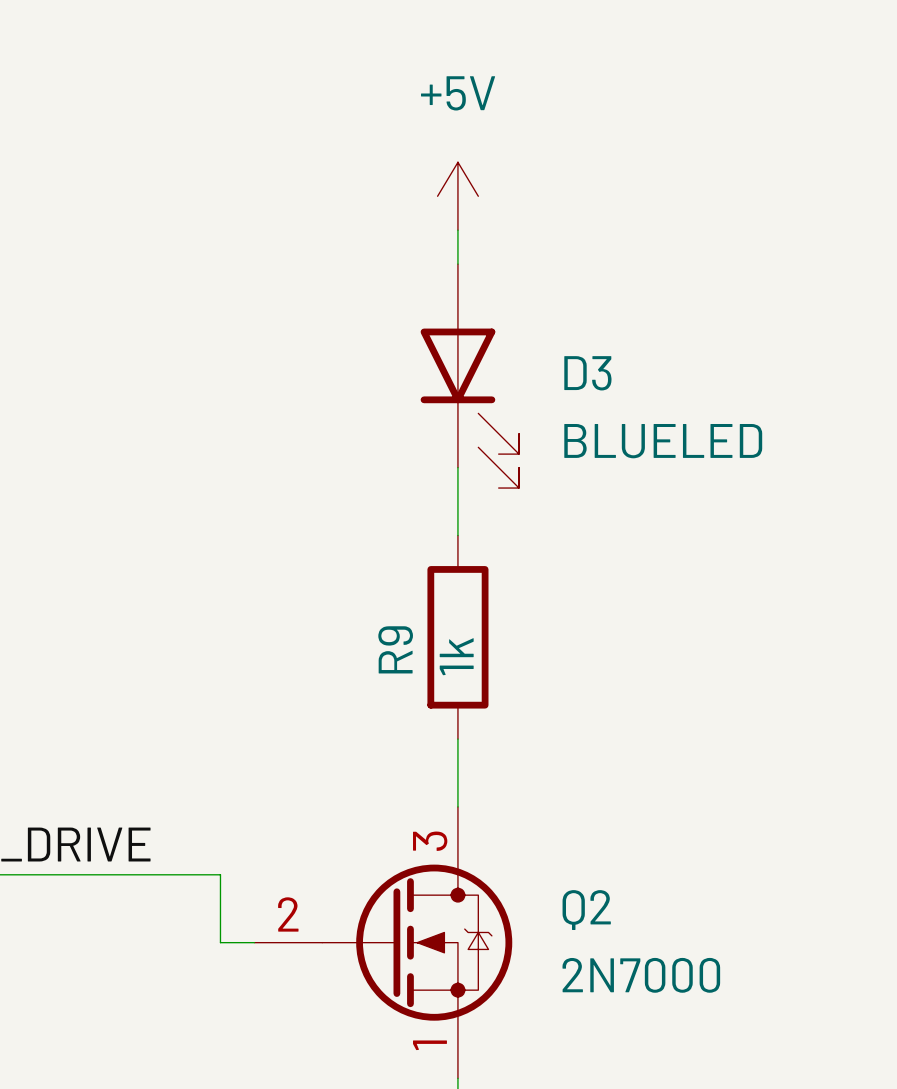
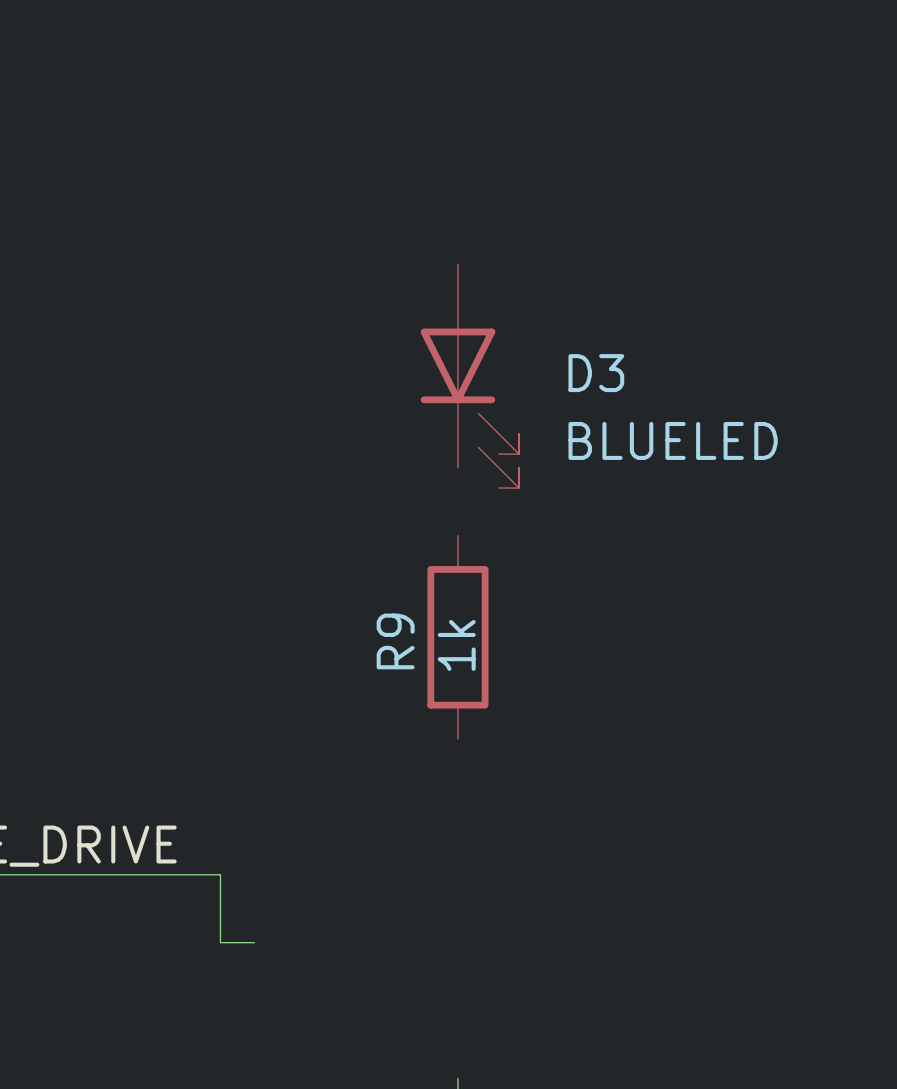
power symbol: +5V (457, 196) -> none
wire: (457, 230) (457, 264) -> none
wire: (457, 467) (457, 535) -> none
wire: (457, 739) (457, 806) -> none
Q2: 2N7000 (383, 942) -> none

